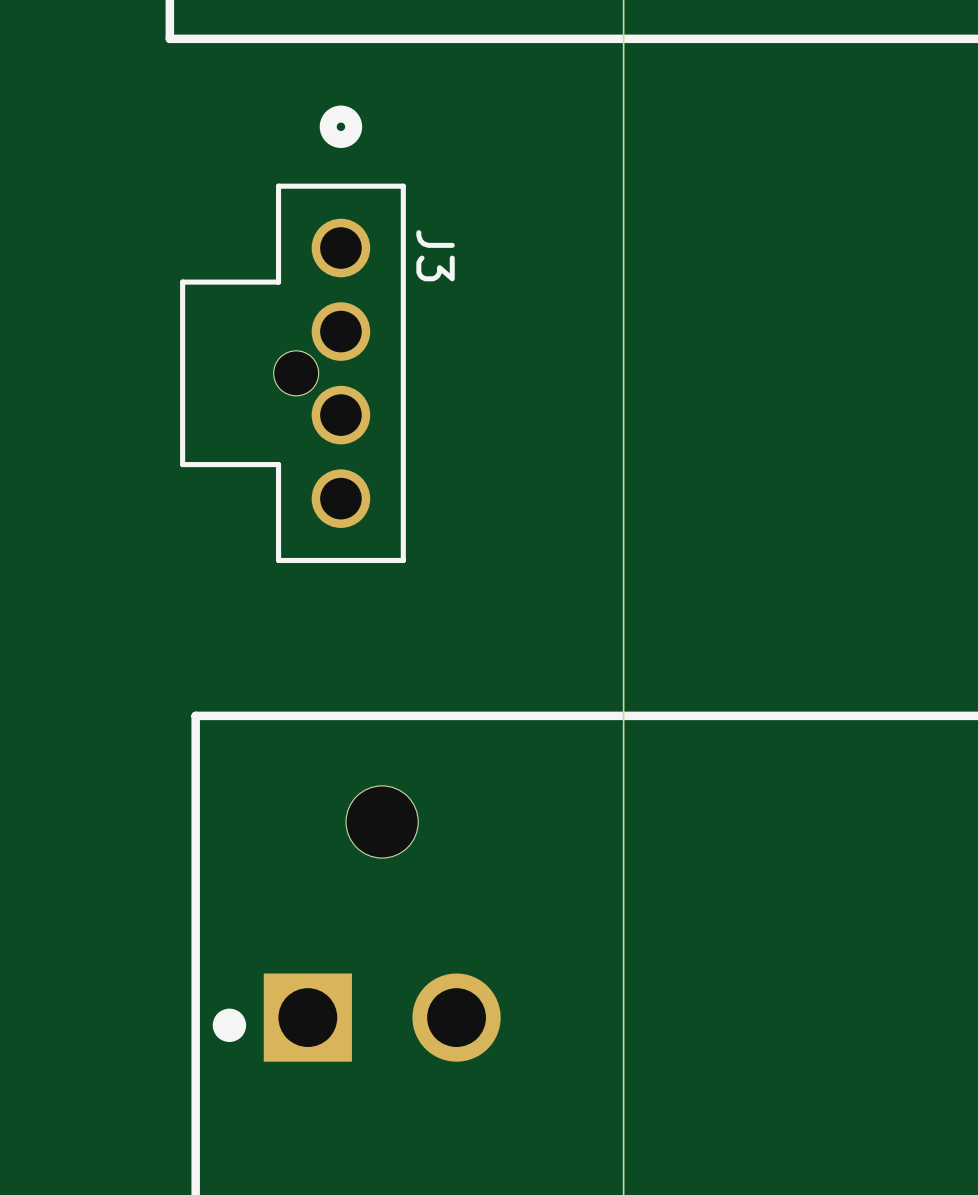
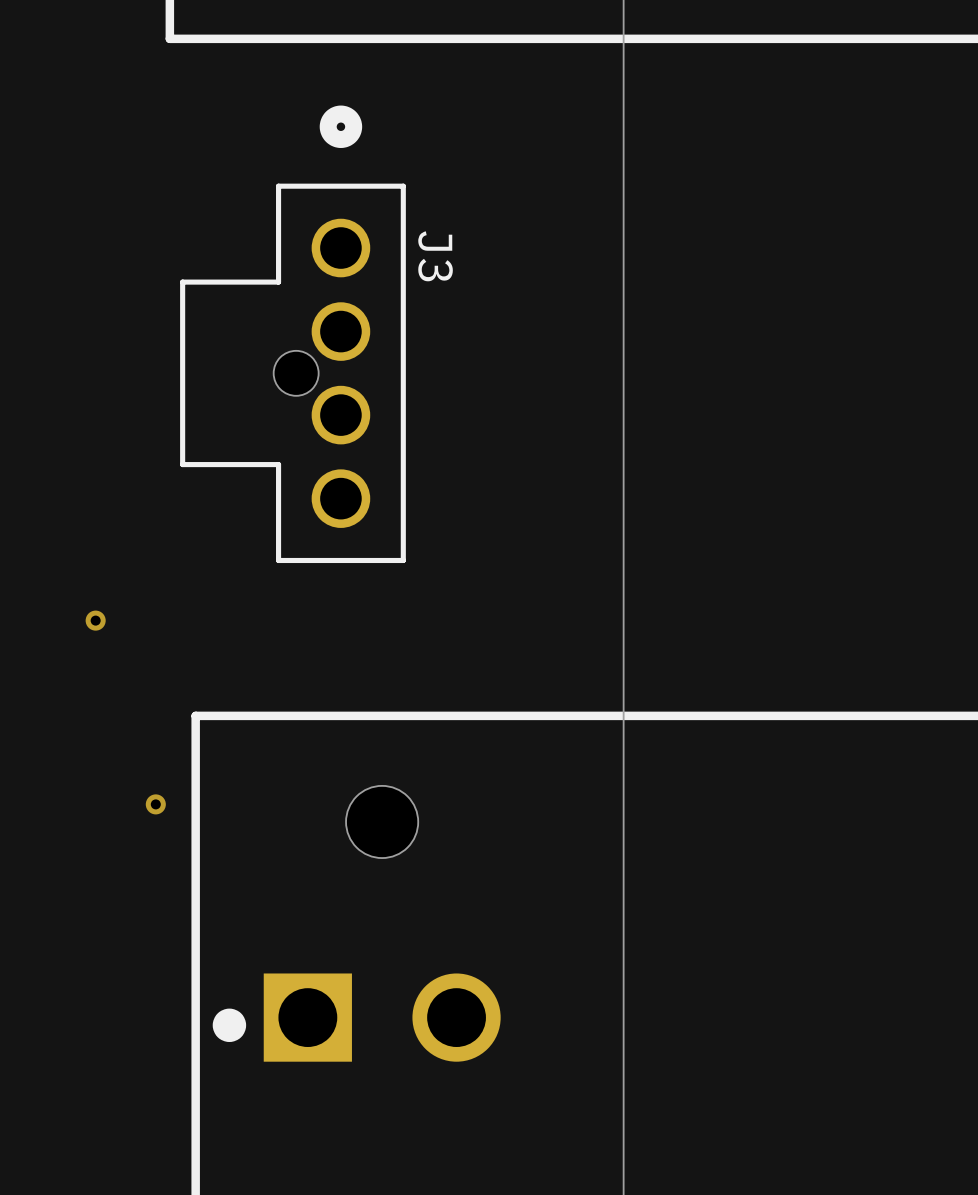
via: none -> (95, 620)
via: none -> (155, 804)

